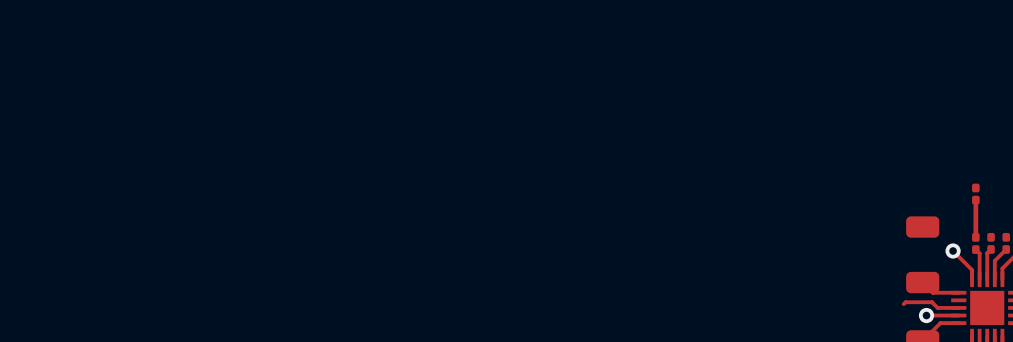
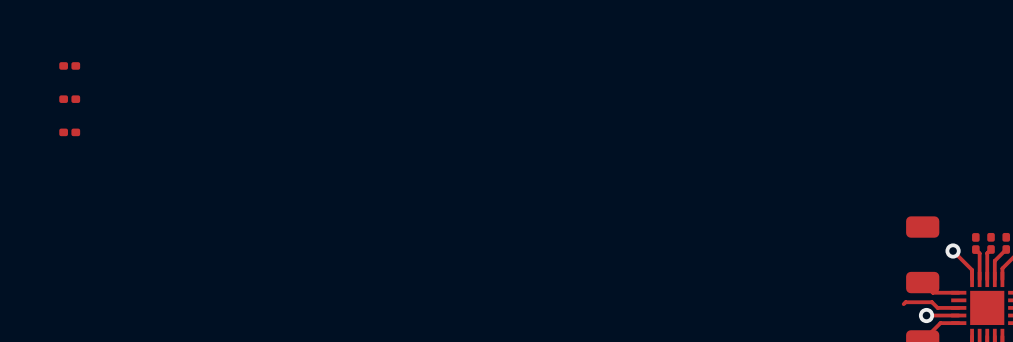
part: none -> (69, 65)
part: none -> (69, 99)
part: none -> (69, 132)
part: (975, 194) -> none
top track: (975, 200) (975, 237) -> none

